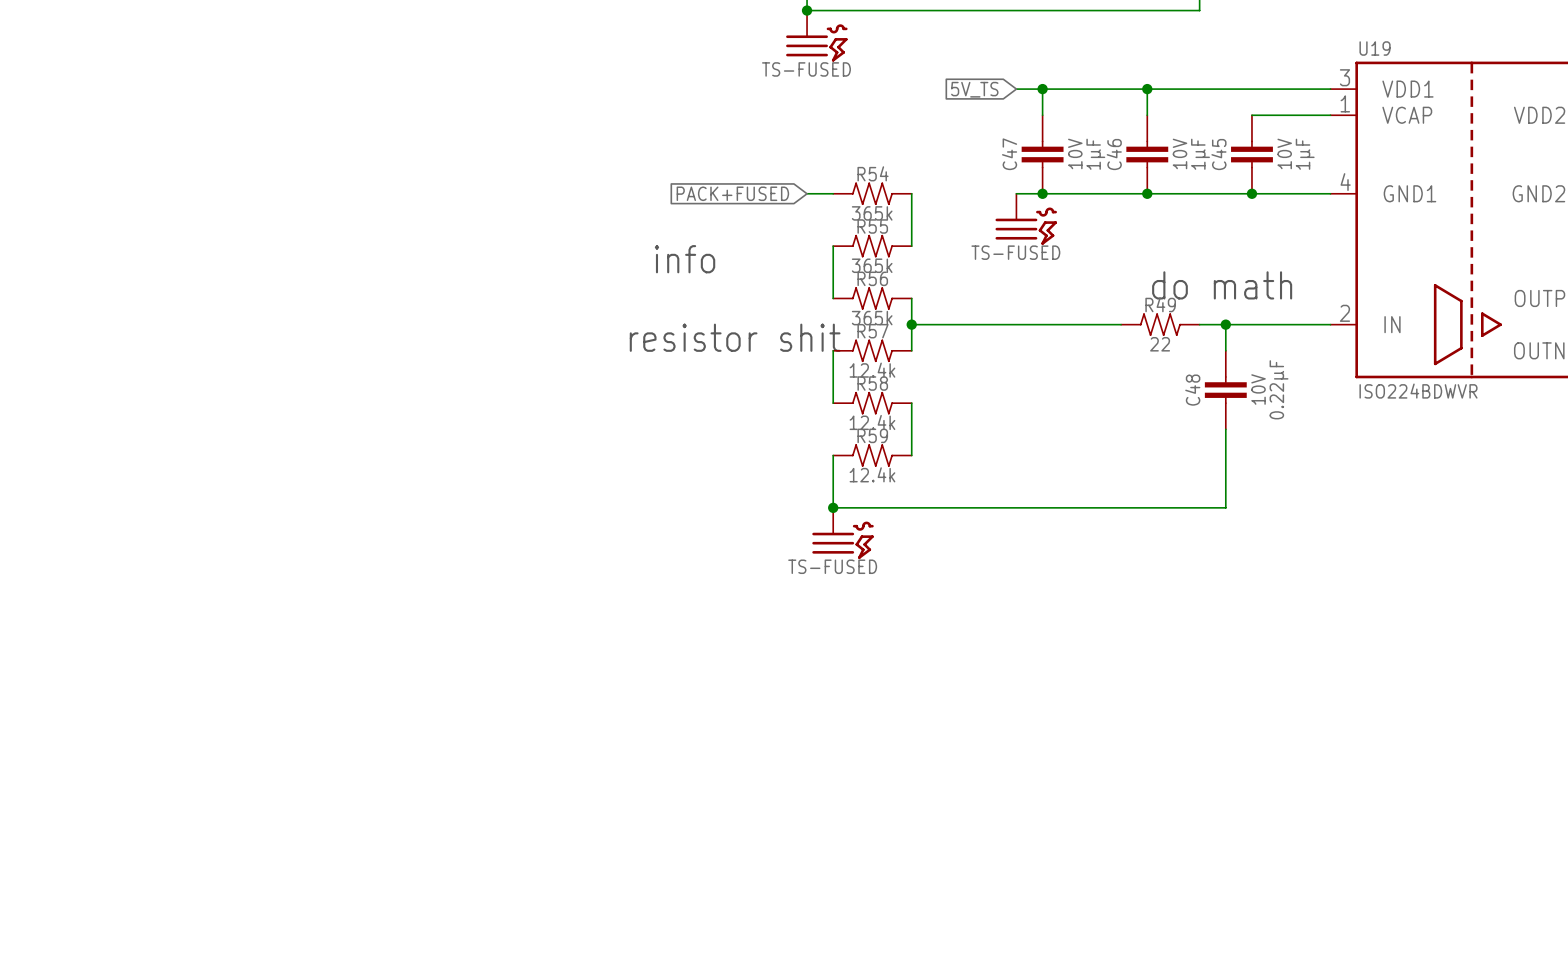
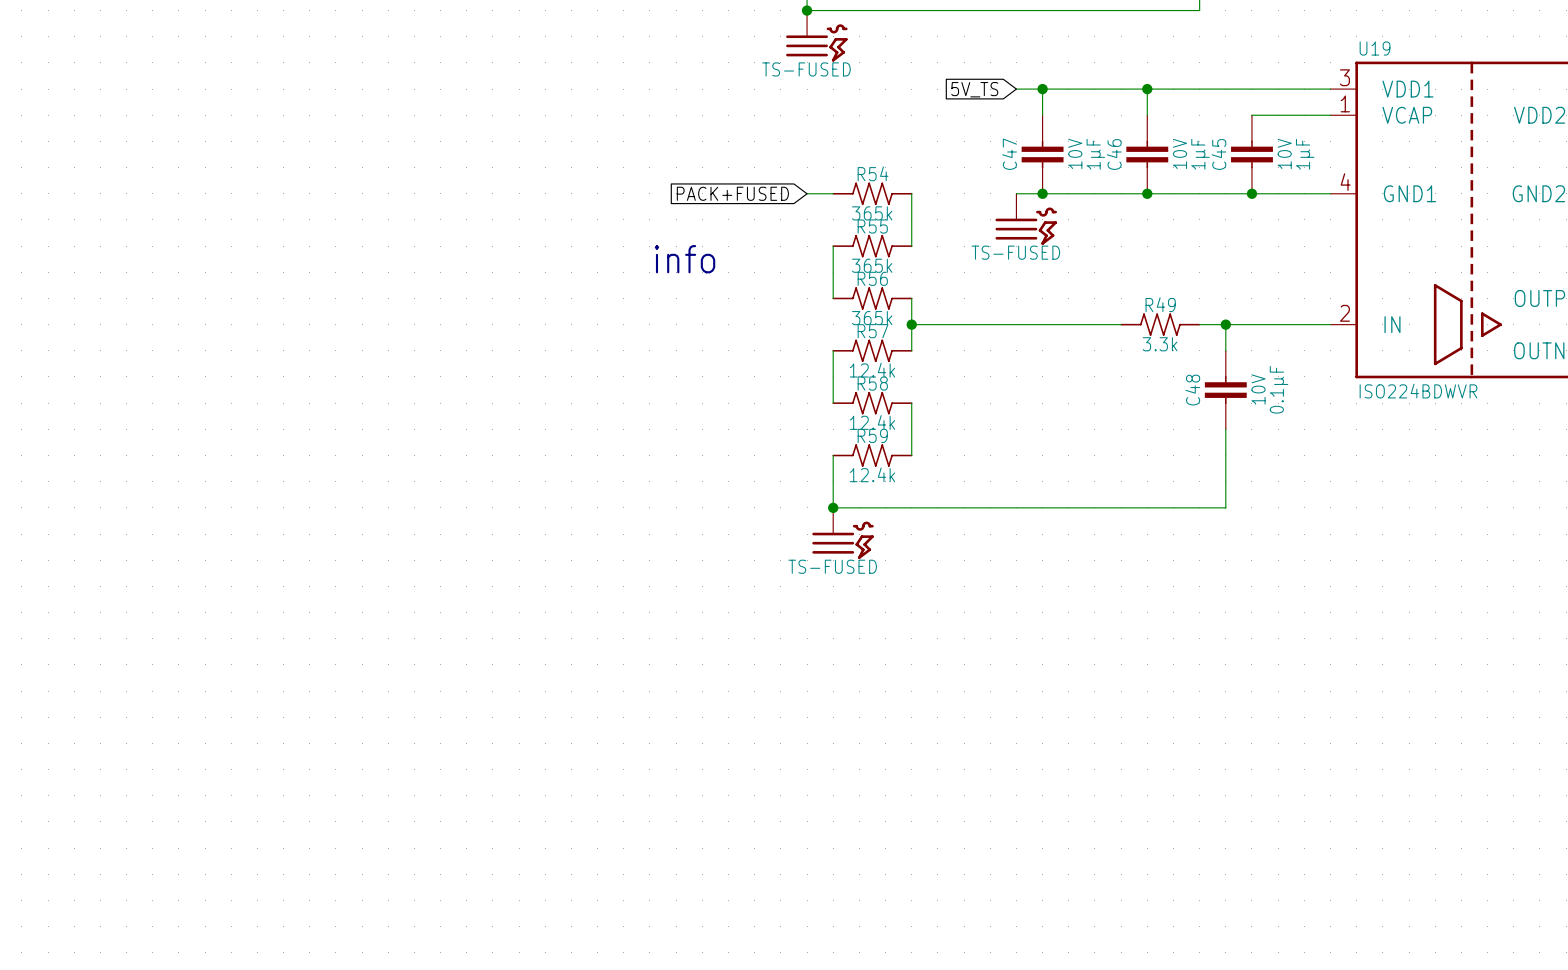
text: do math (1222, 285) -> none
text: resistor shit (735, 337) -> none
R49 text: 22 (1160, 344) -> 3.3k (1160, 344)
C48 text: 0.22µF (1279, 389) -> 0.1µF (1279, 389)

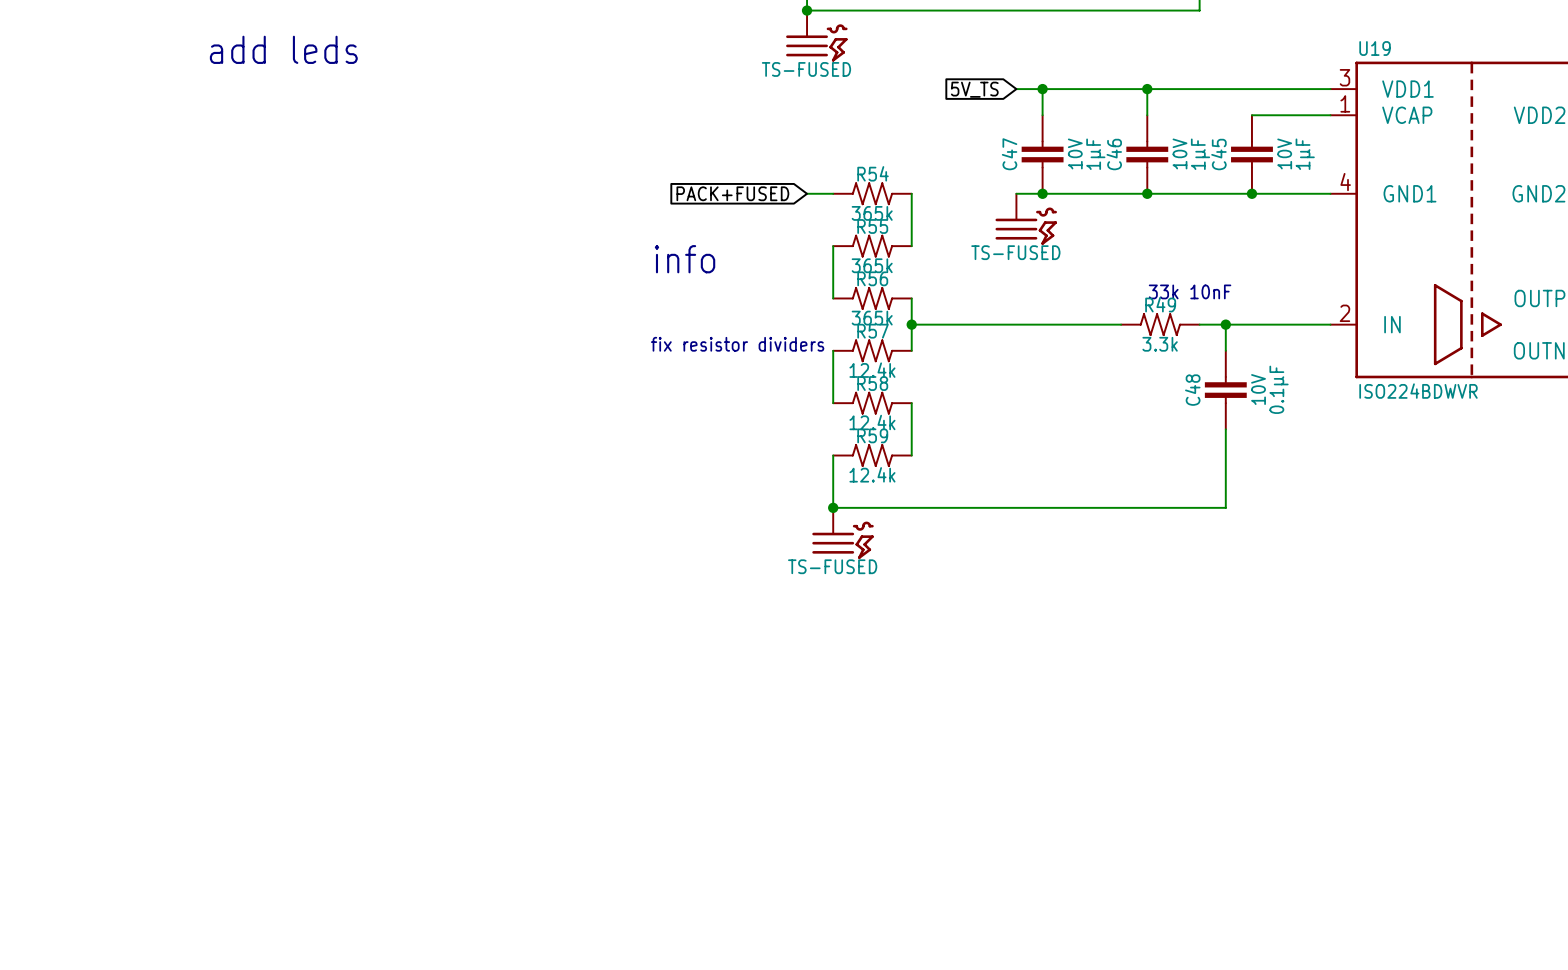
text: none -> add leds (283, 49)
text: none -> 33k 10nF (1190, 291)
text: none -> fix resistor dividers (737, 344)

